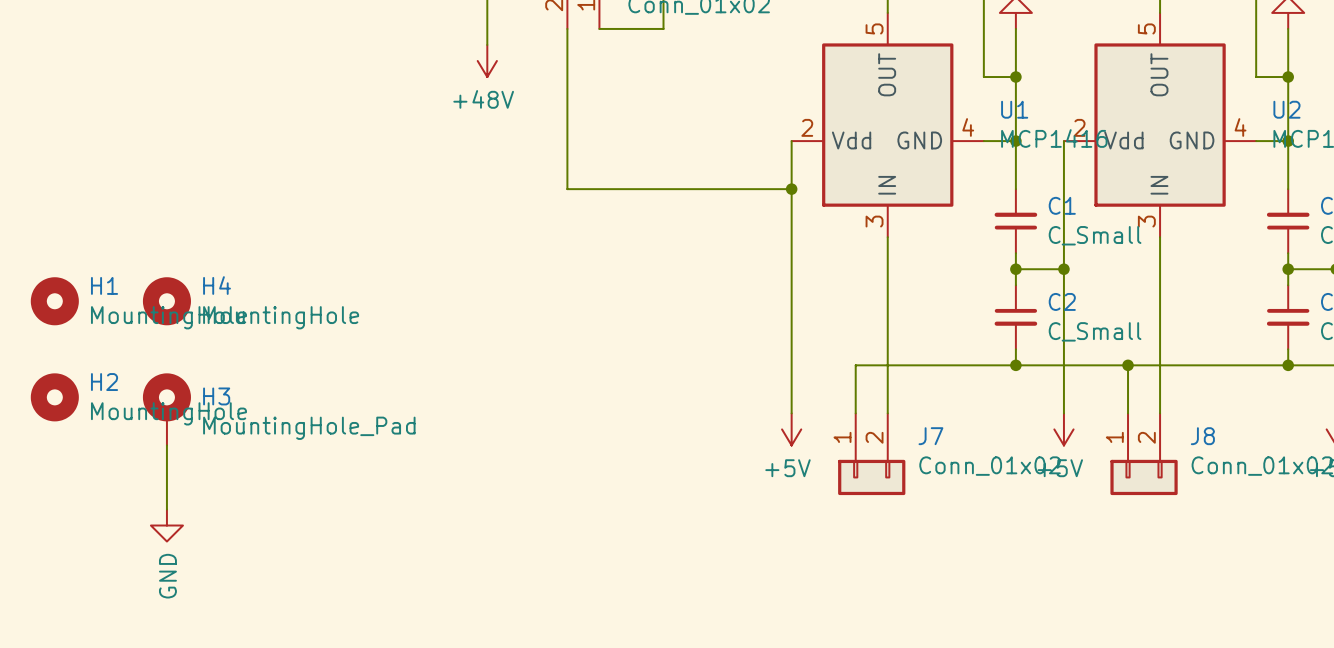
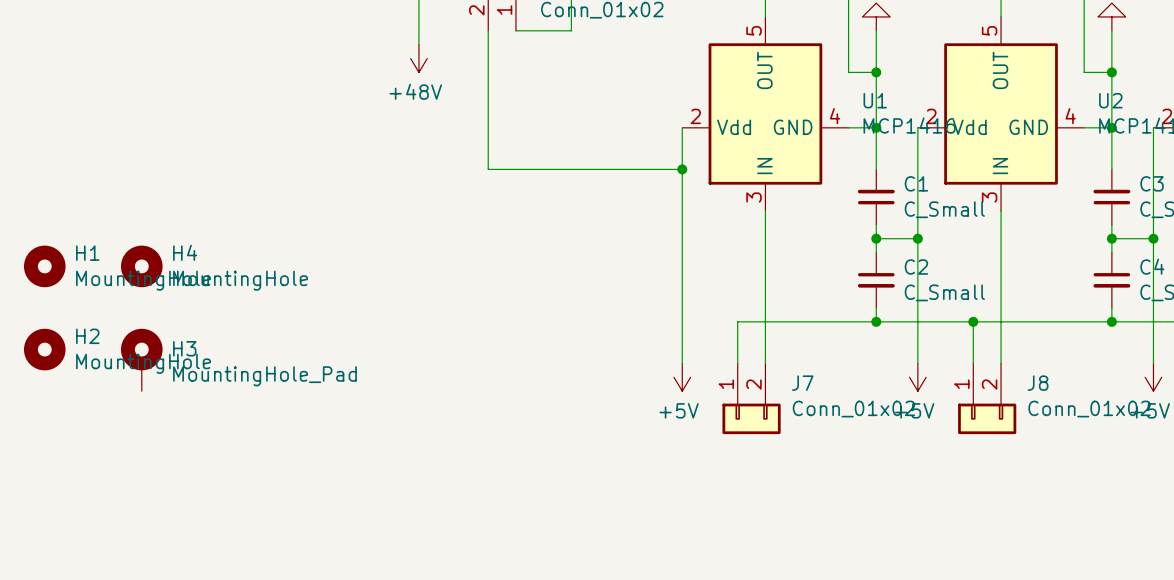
wire: (166, 445) (166, 509) -> none
power symbol: GND (166, 525) -> none

